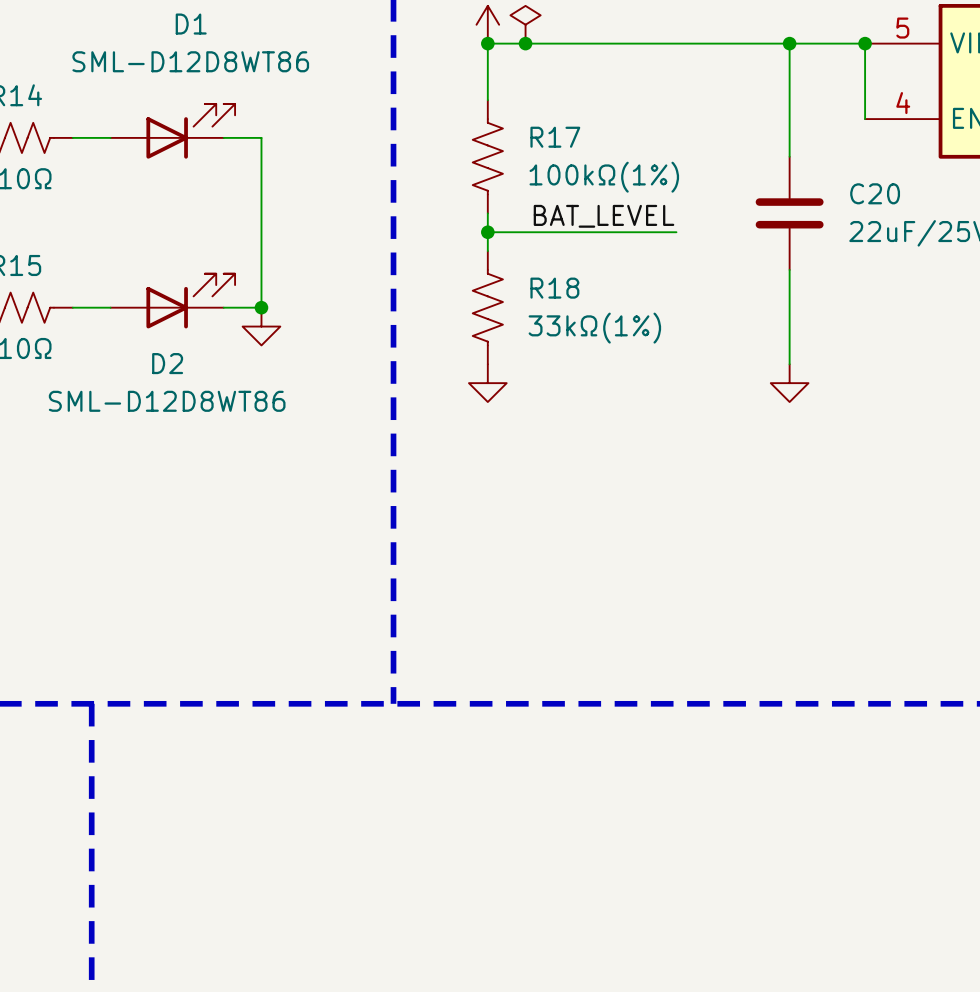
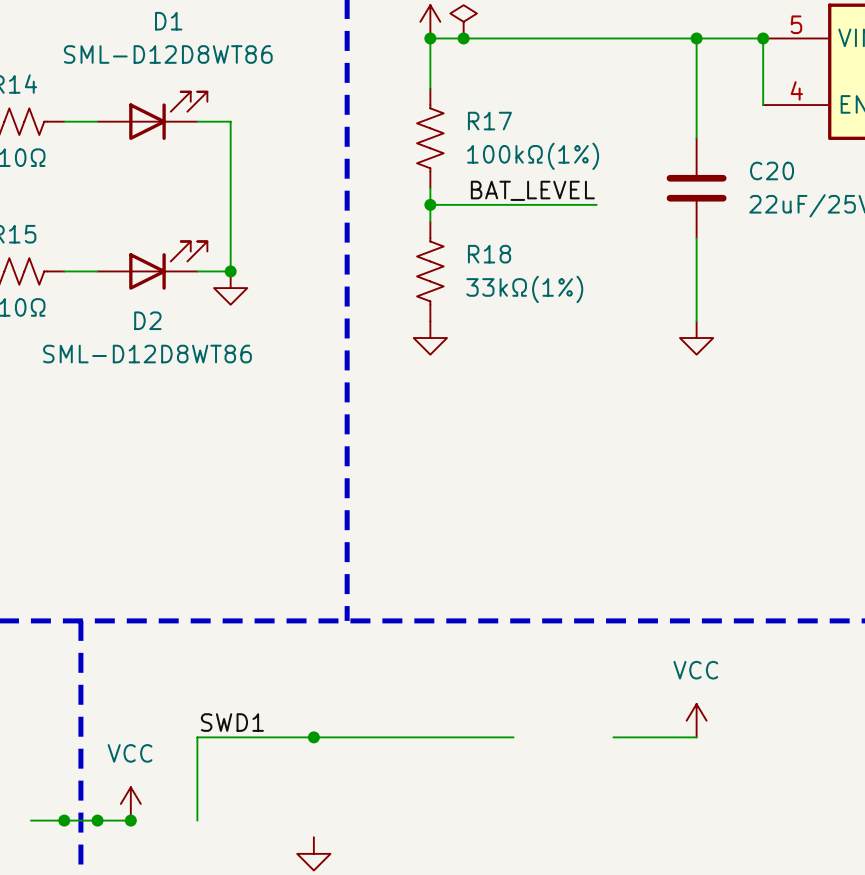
power symbol: none -> VCC (696, 720)
label: none -> SWD1 (232, 722)
junction: none -> (313, 737)
wire: none -> (513, 737) (197, 737) (197, 820)
wire: none -> (613, 737) (696, 737)
power symbol: none -> VCC (130, 803)
wire: none -> (30, 820) (130, 820)
junction: none -> (64, 820)
junction: none -> (97, 820)
junction: none -> (130, 820)
power symbol: none -> (313, 853)

